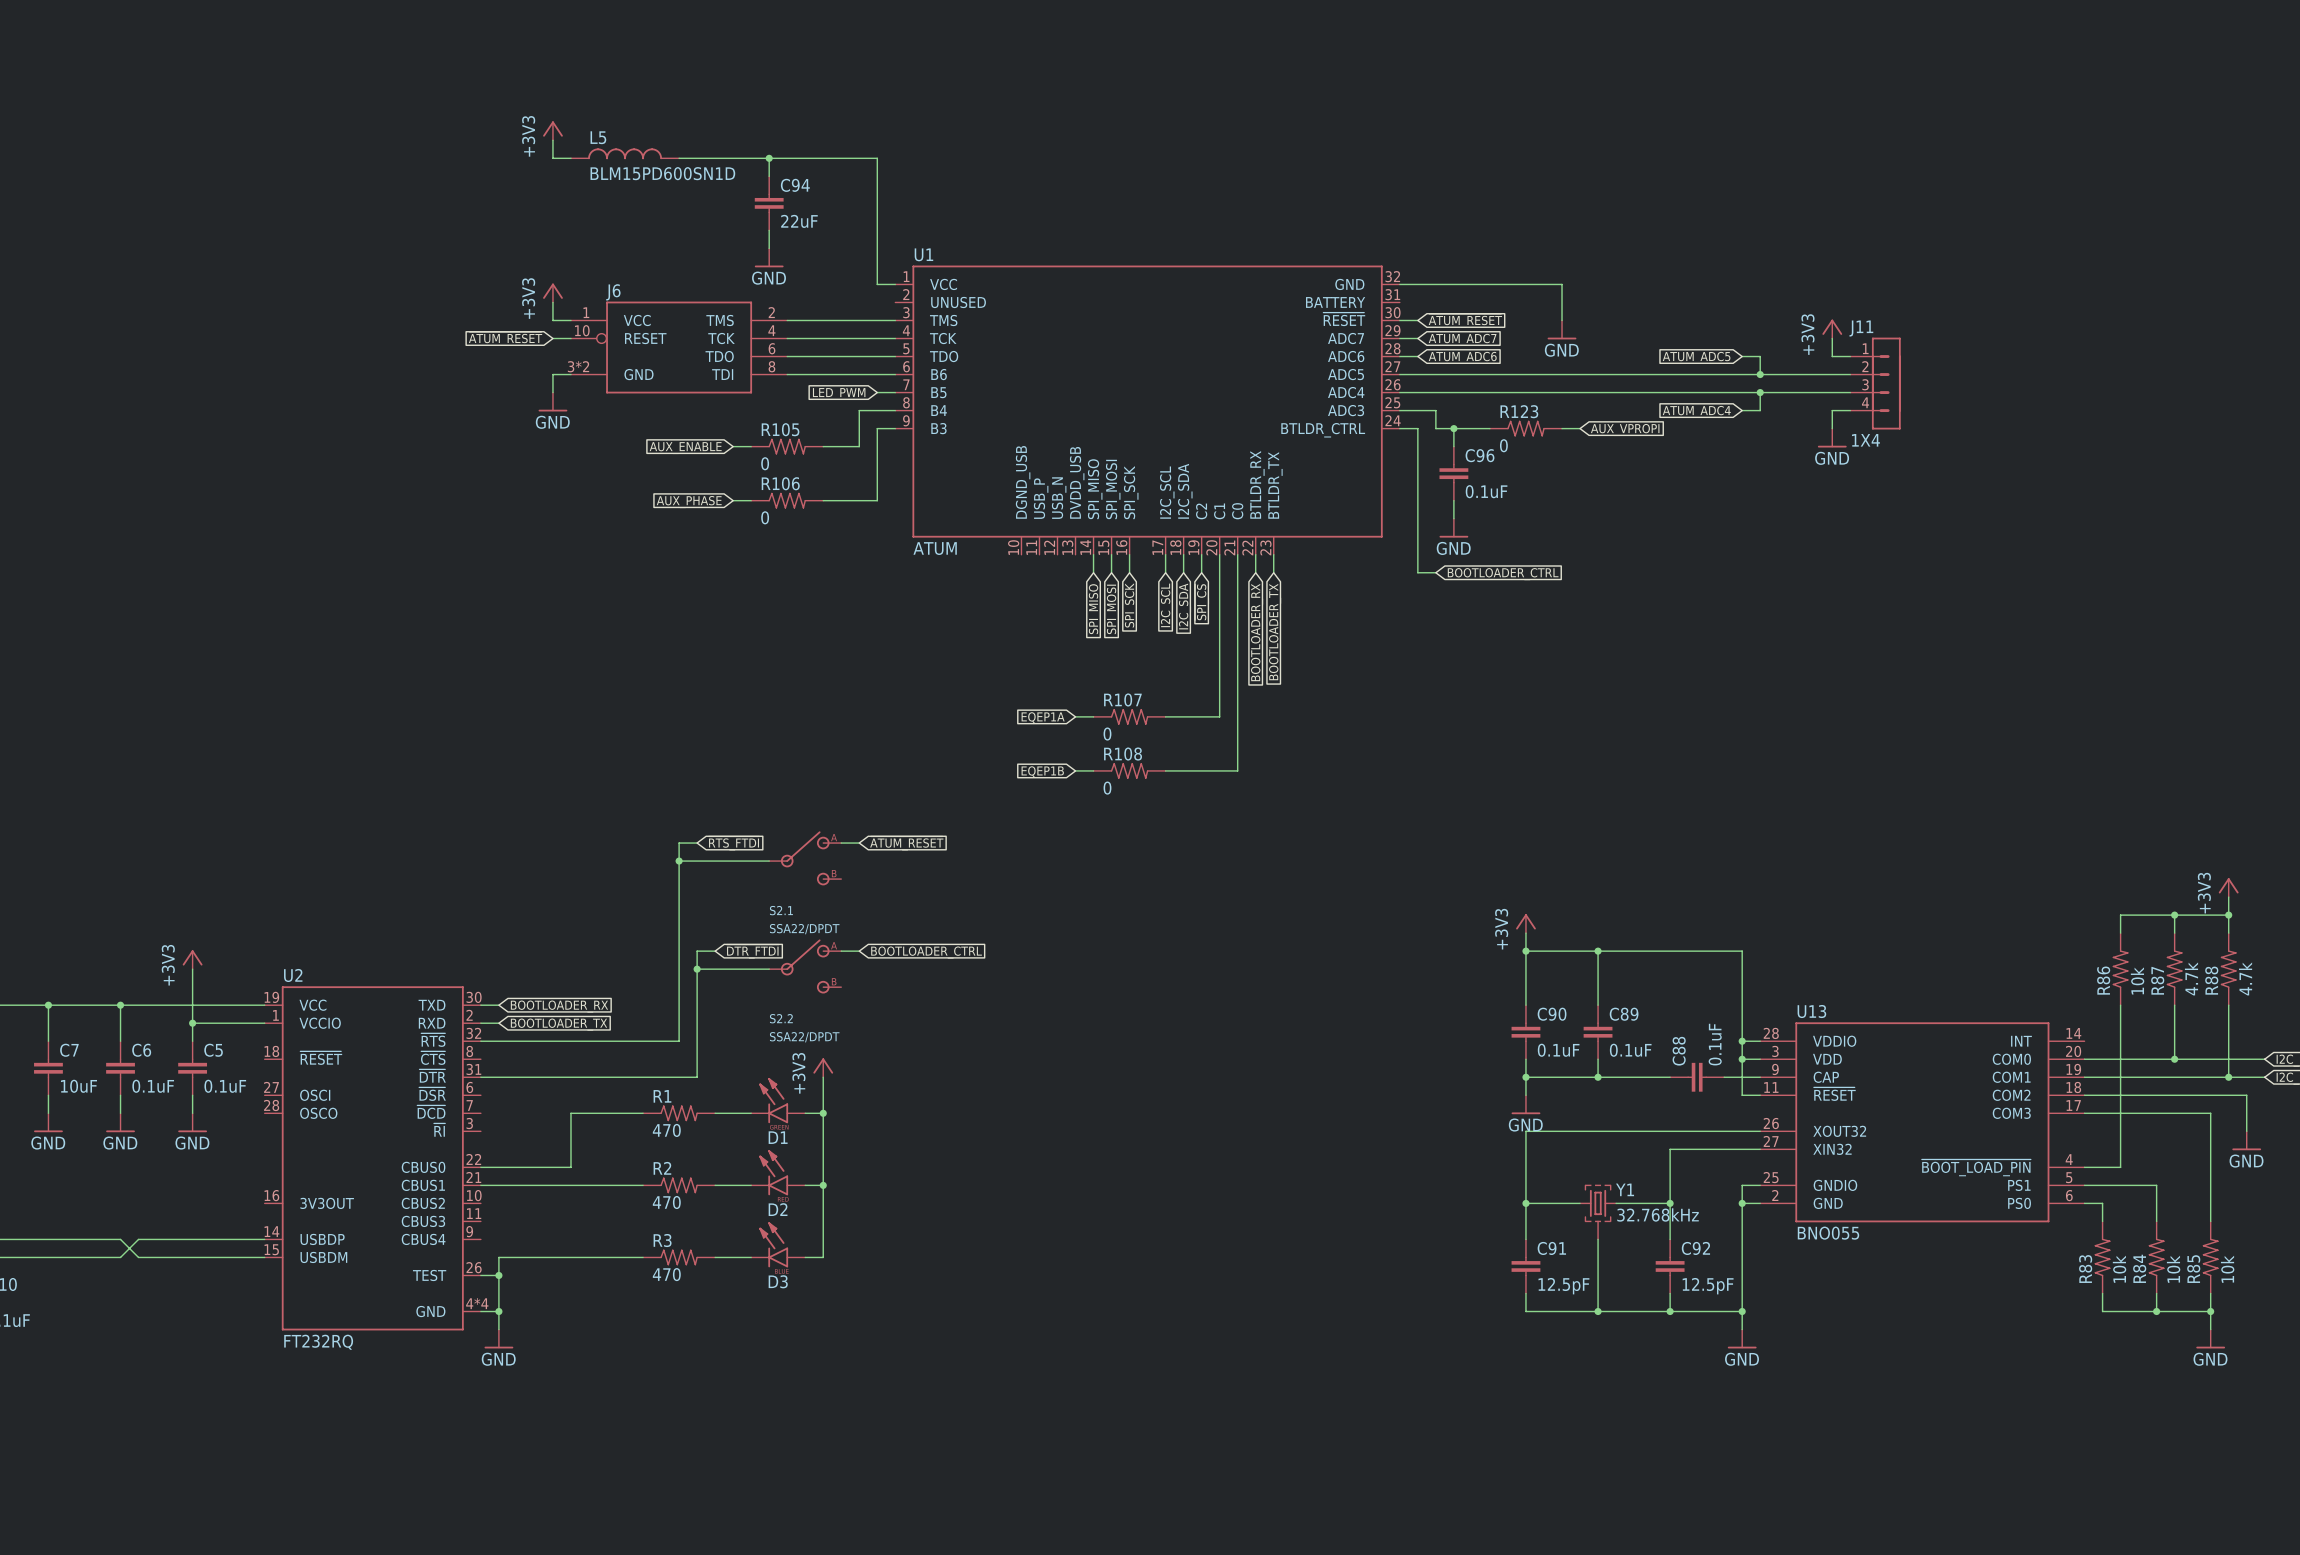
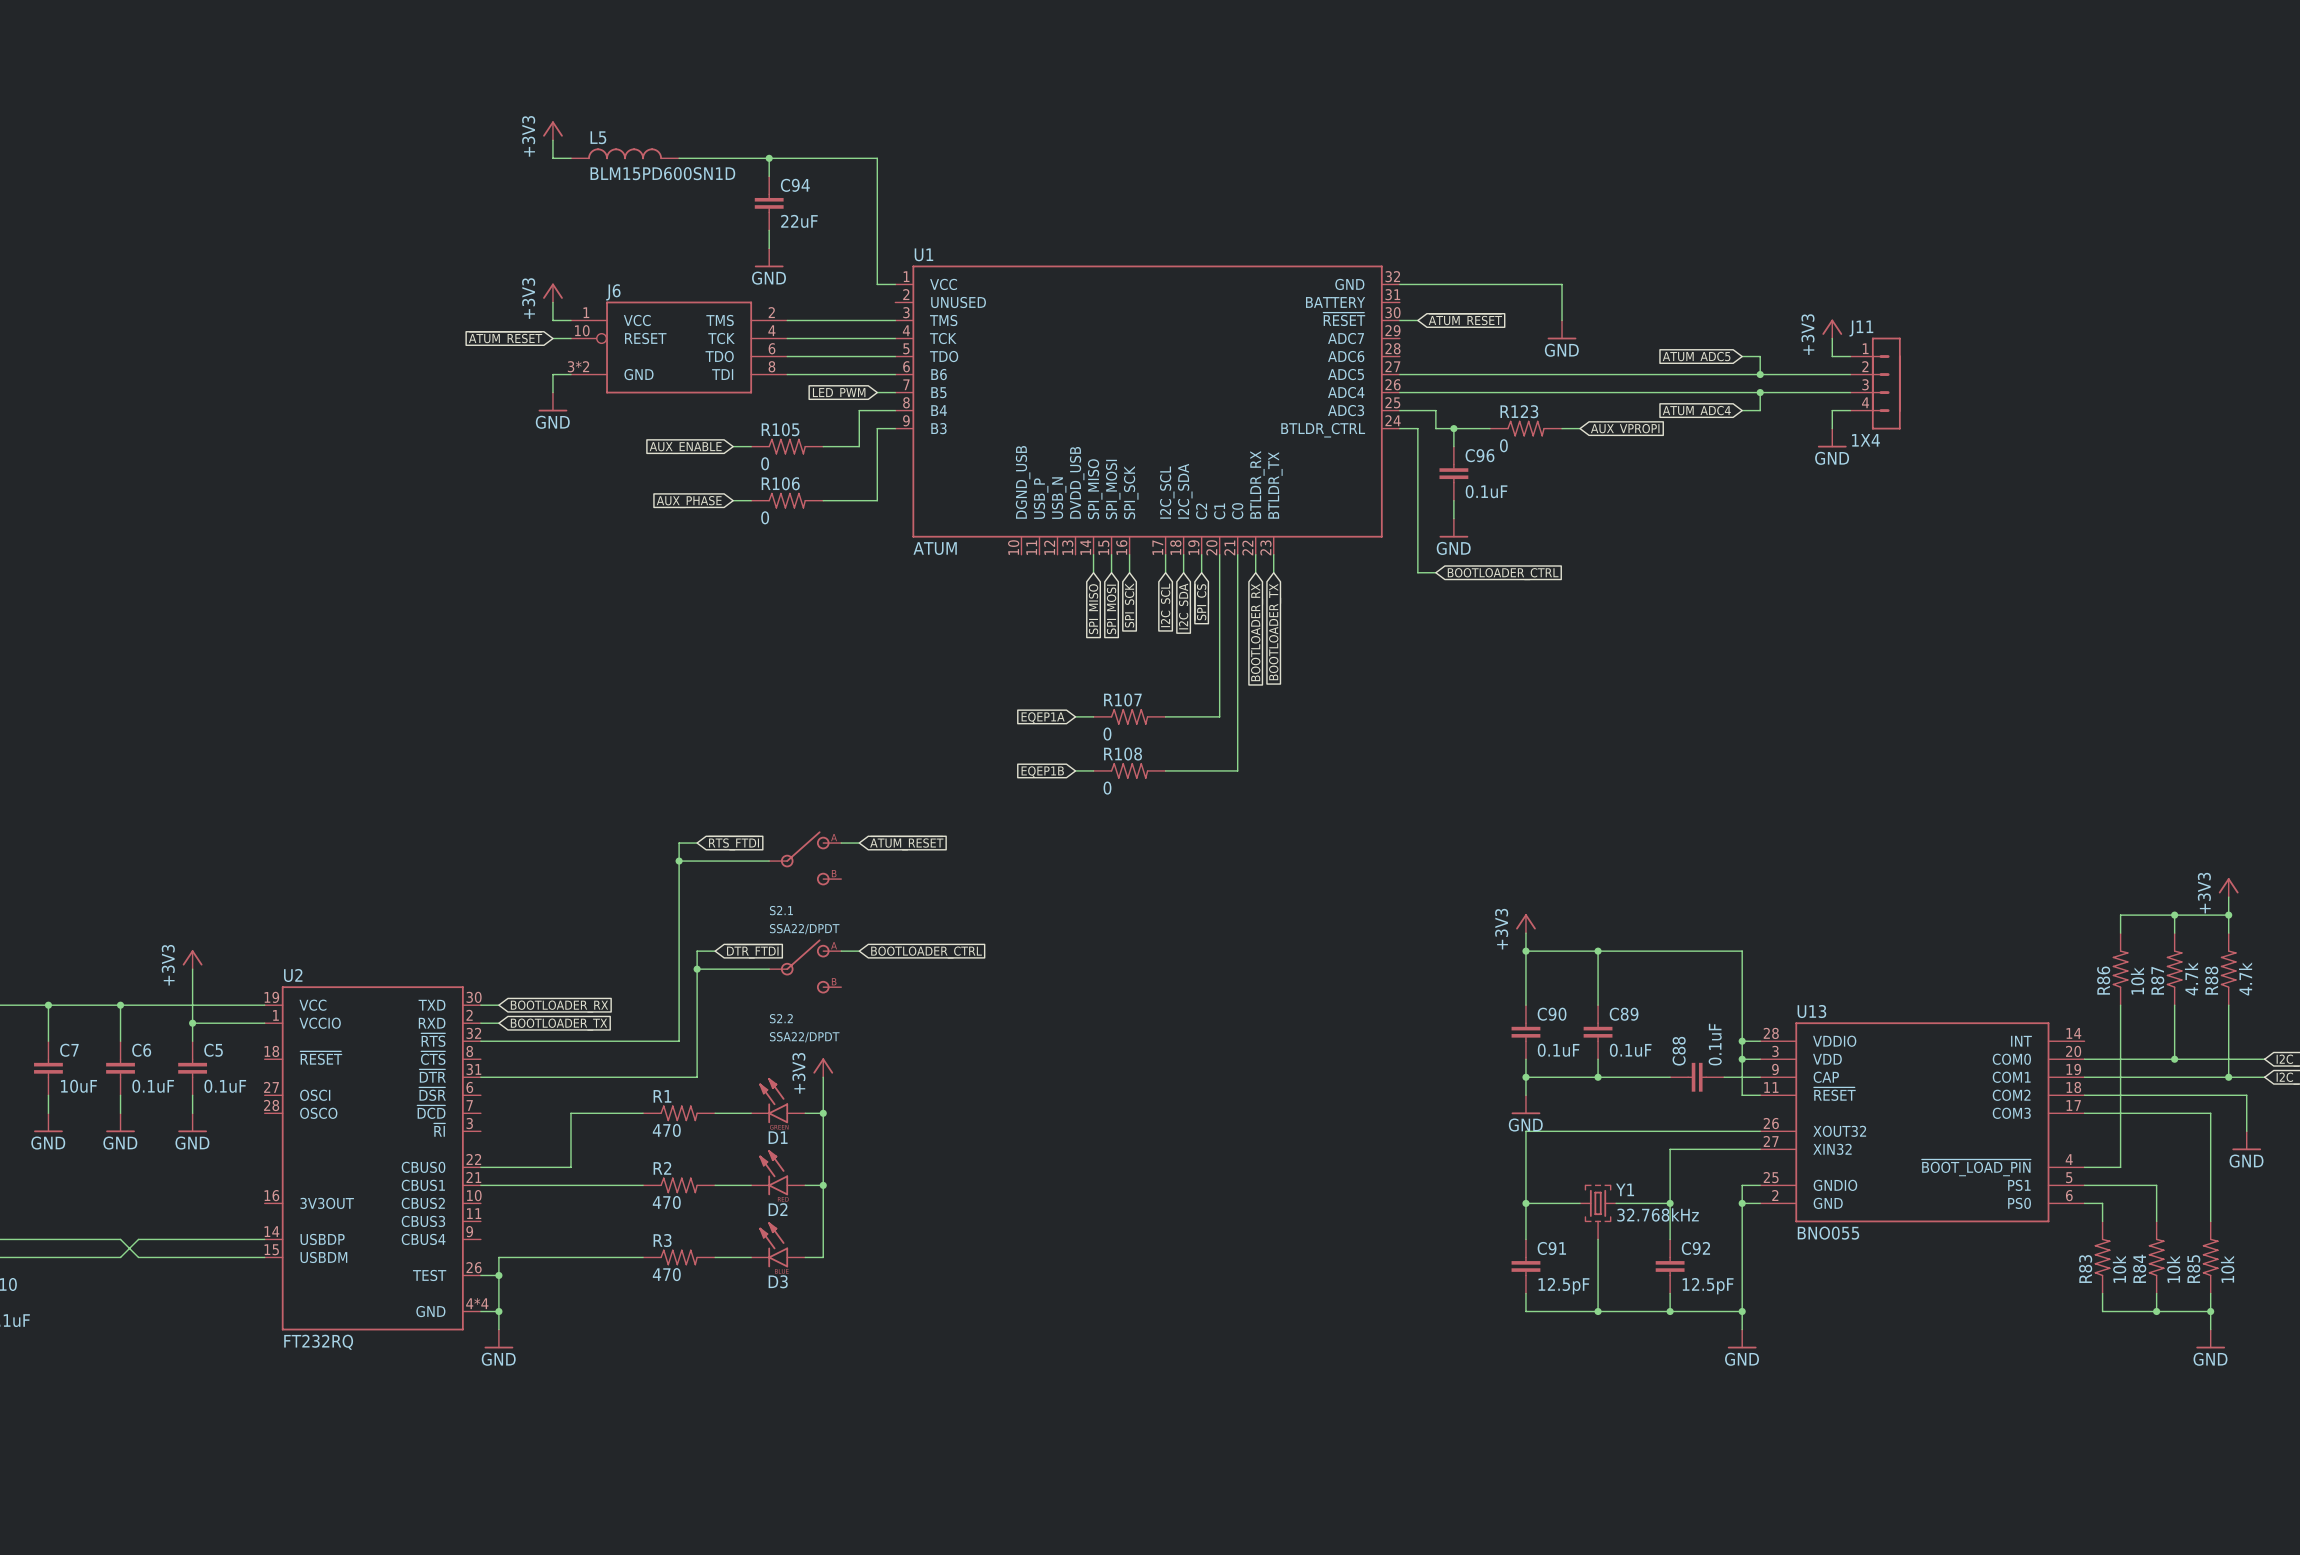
wire: (1399, 338) (1417, 338) -> none
global label: ATUM_ADC7 (1462, 339) -> none
wire: (1399, 356) (1417, 356) -> none
global label: ATUM_ADC6 (1462, 357) -> none

